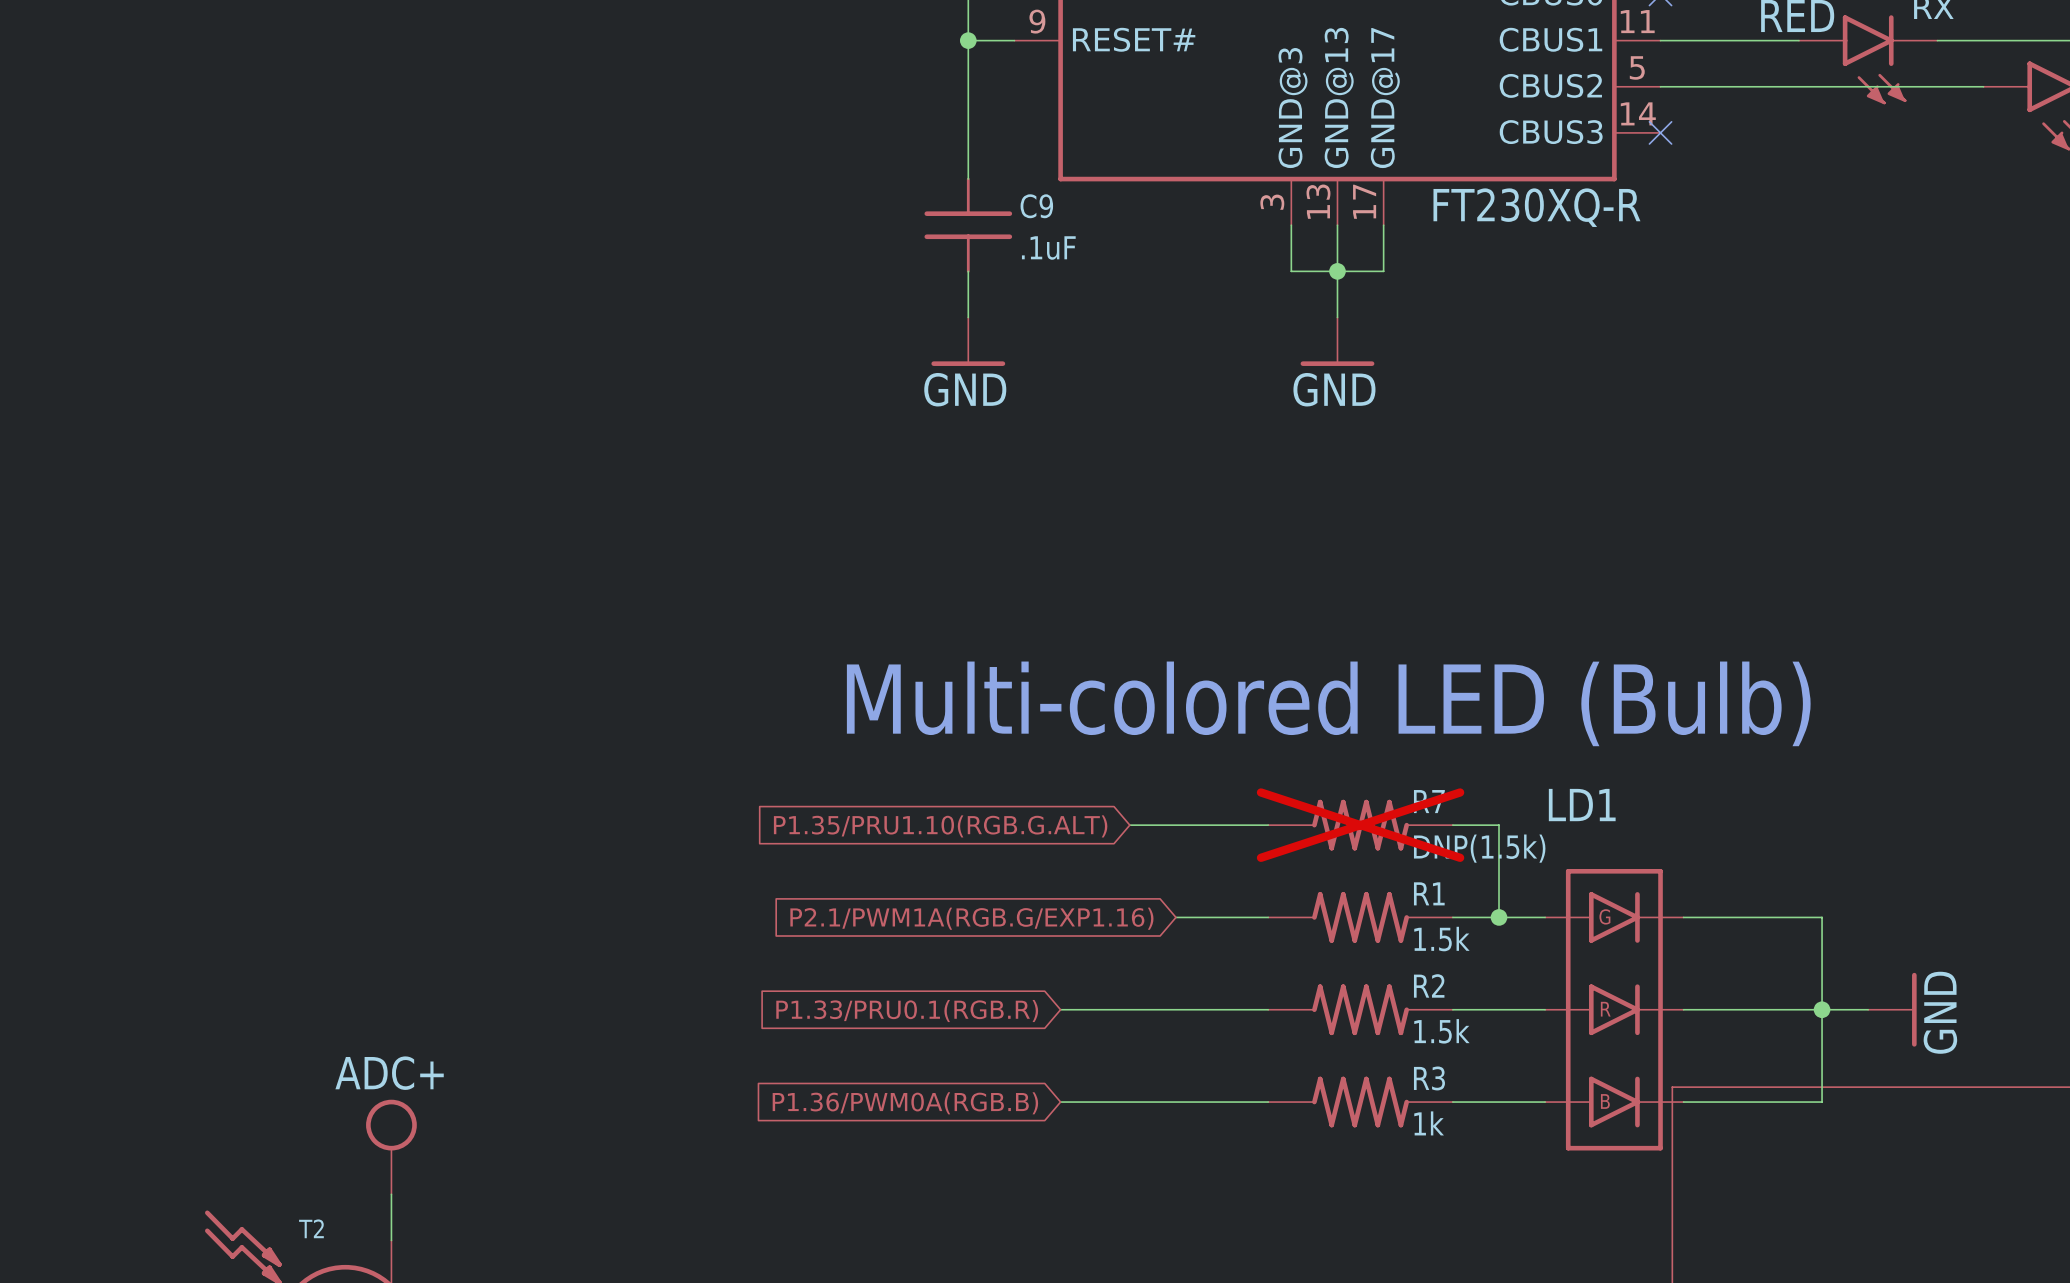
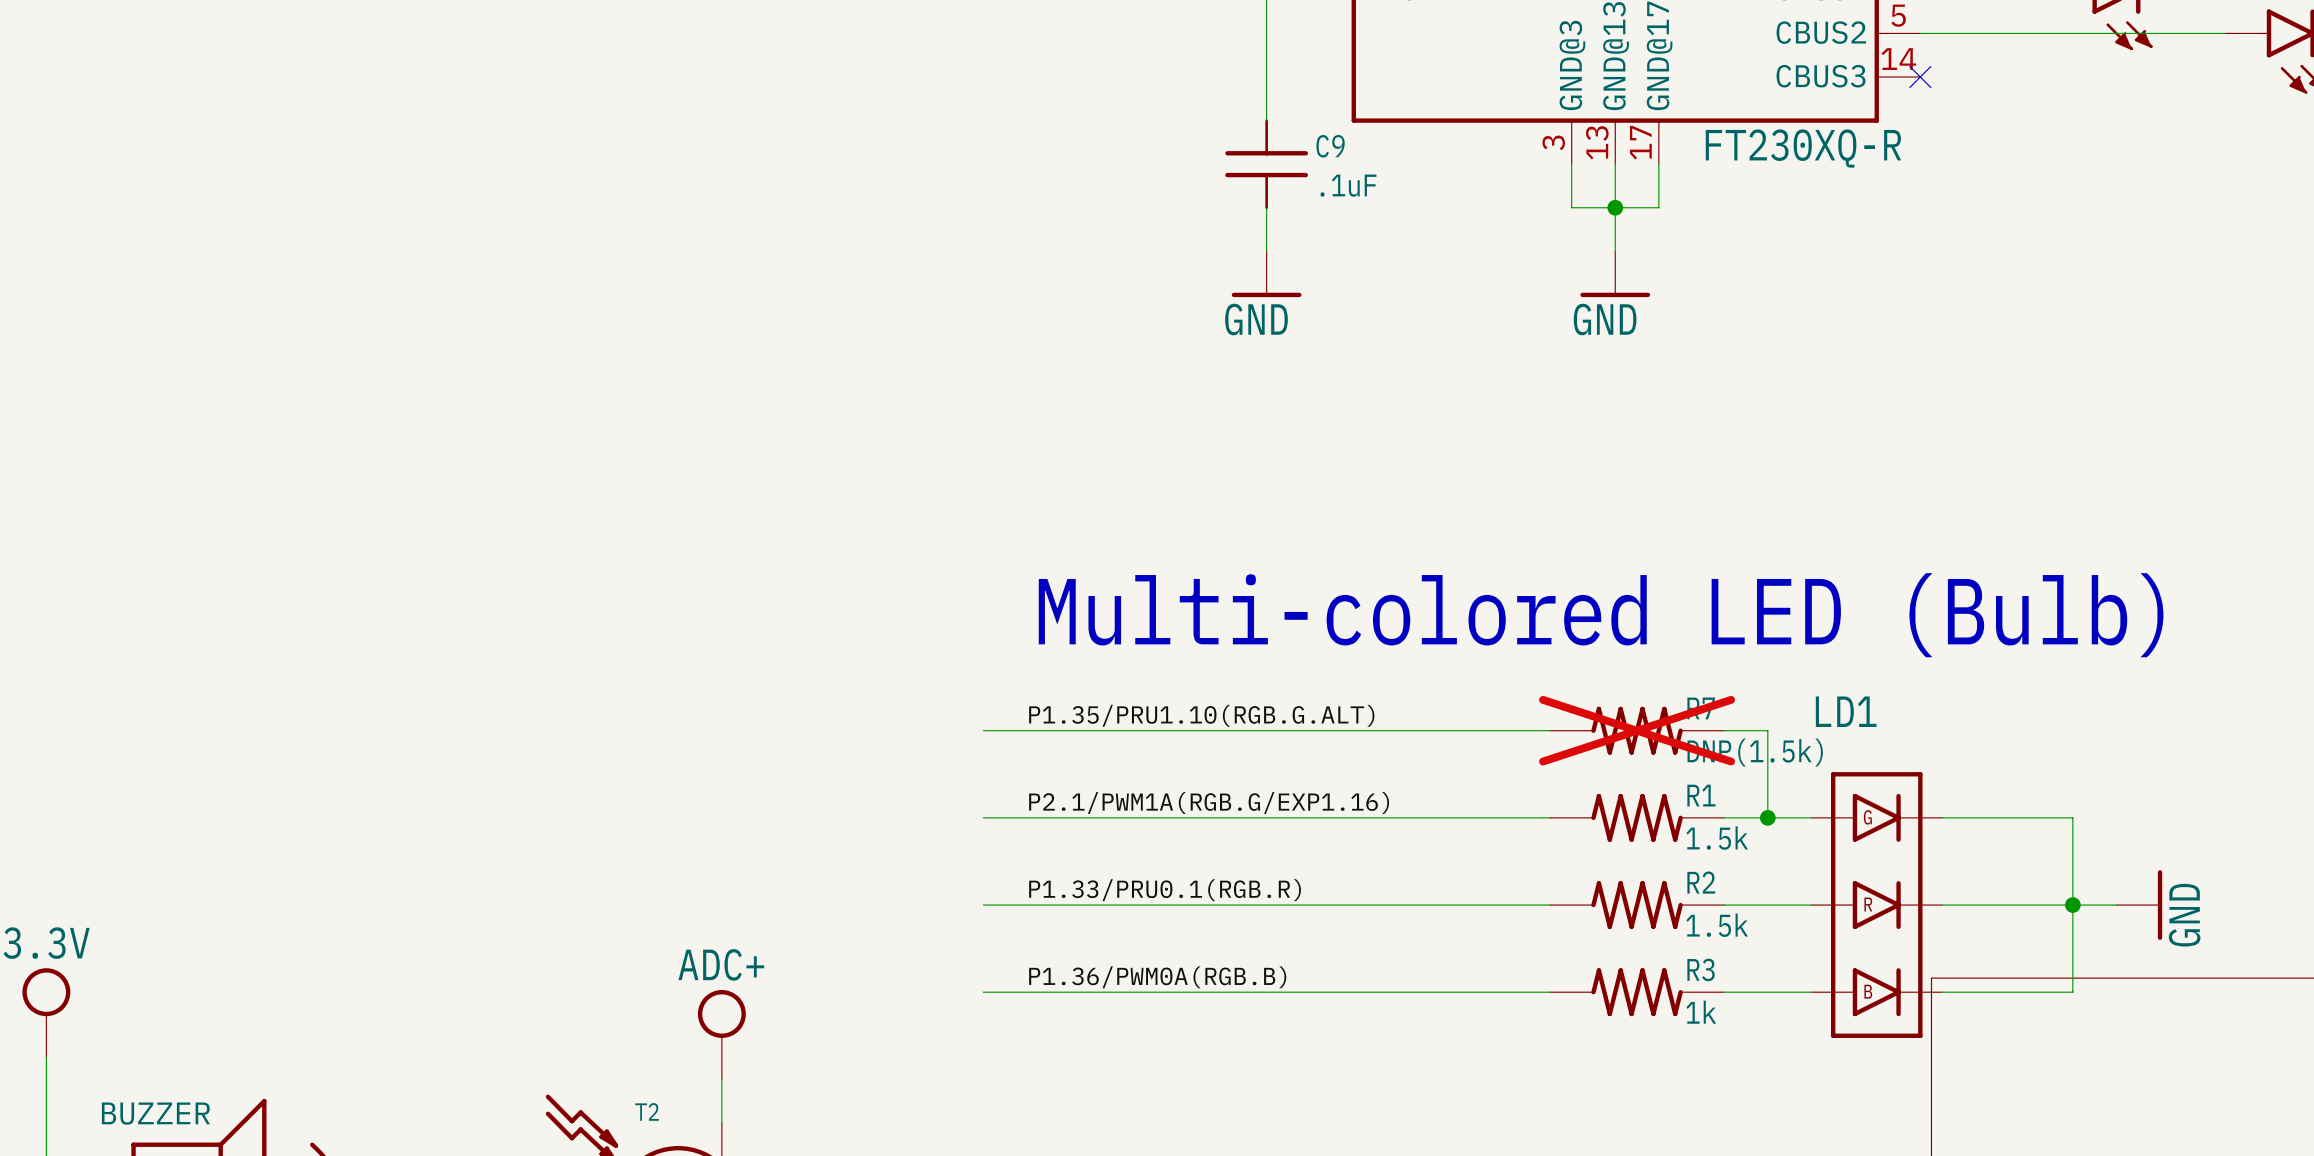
label: none -> P1.35/PRU1.10(RGB.G.ALT) (1201, 715)
wire: none -> (983, 730) (1419, 730)
global label: P1.35/PRU1.10(RGB.G.ALT) (940, 826) -> none
label: none -> P2.1/PWM1A(RGB.G/EXP1.16) (1209, 802)
wire: none -> (983, 817) (1462, 817)
global label: P2.1/PWM1A(RGB.G/EXP1.16) (971, 918) -> none
label: none -> P1.33/PRU0.1(RGB.R) (1165, 890)
wire: none -> (983, 905) (1353, 905)
global label: P1.33/PRU0.1(RGB.R) (907, 1011) -> none
label: none -> P1.36/PWM0A(RGB.B) (1157, 977)
wire: none -> (983, 992) (1353, 992)
global label: P1.36/PWM0A(RGB.B) (905, 1103) -> none

